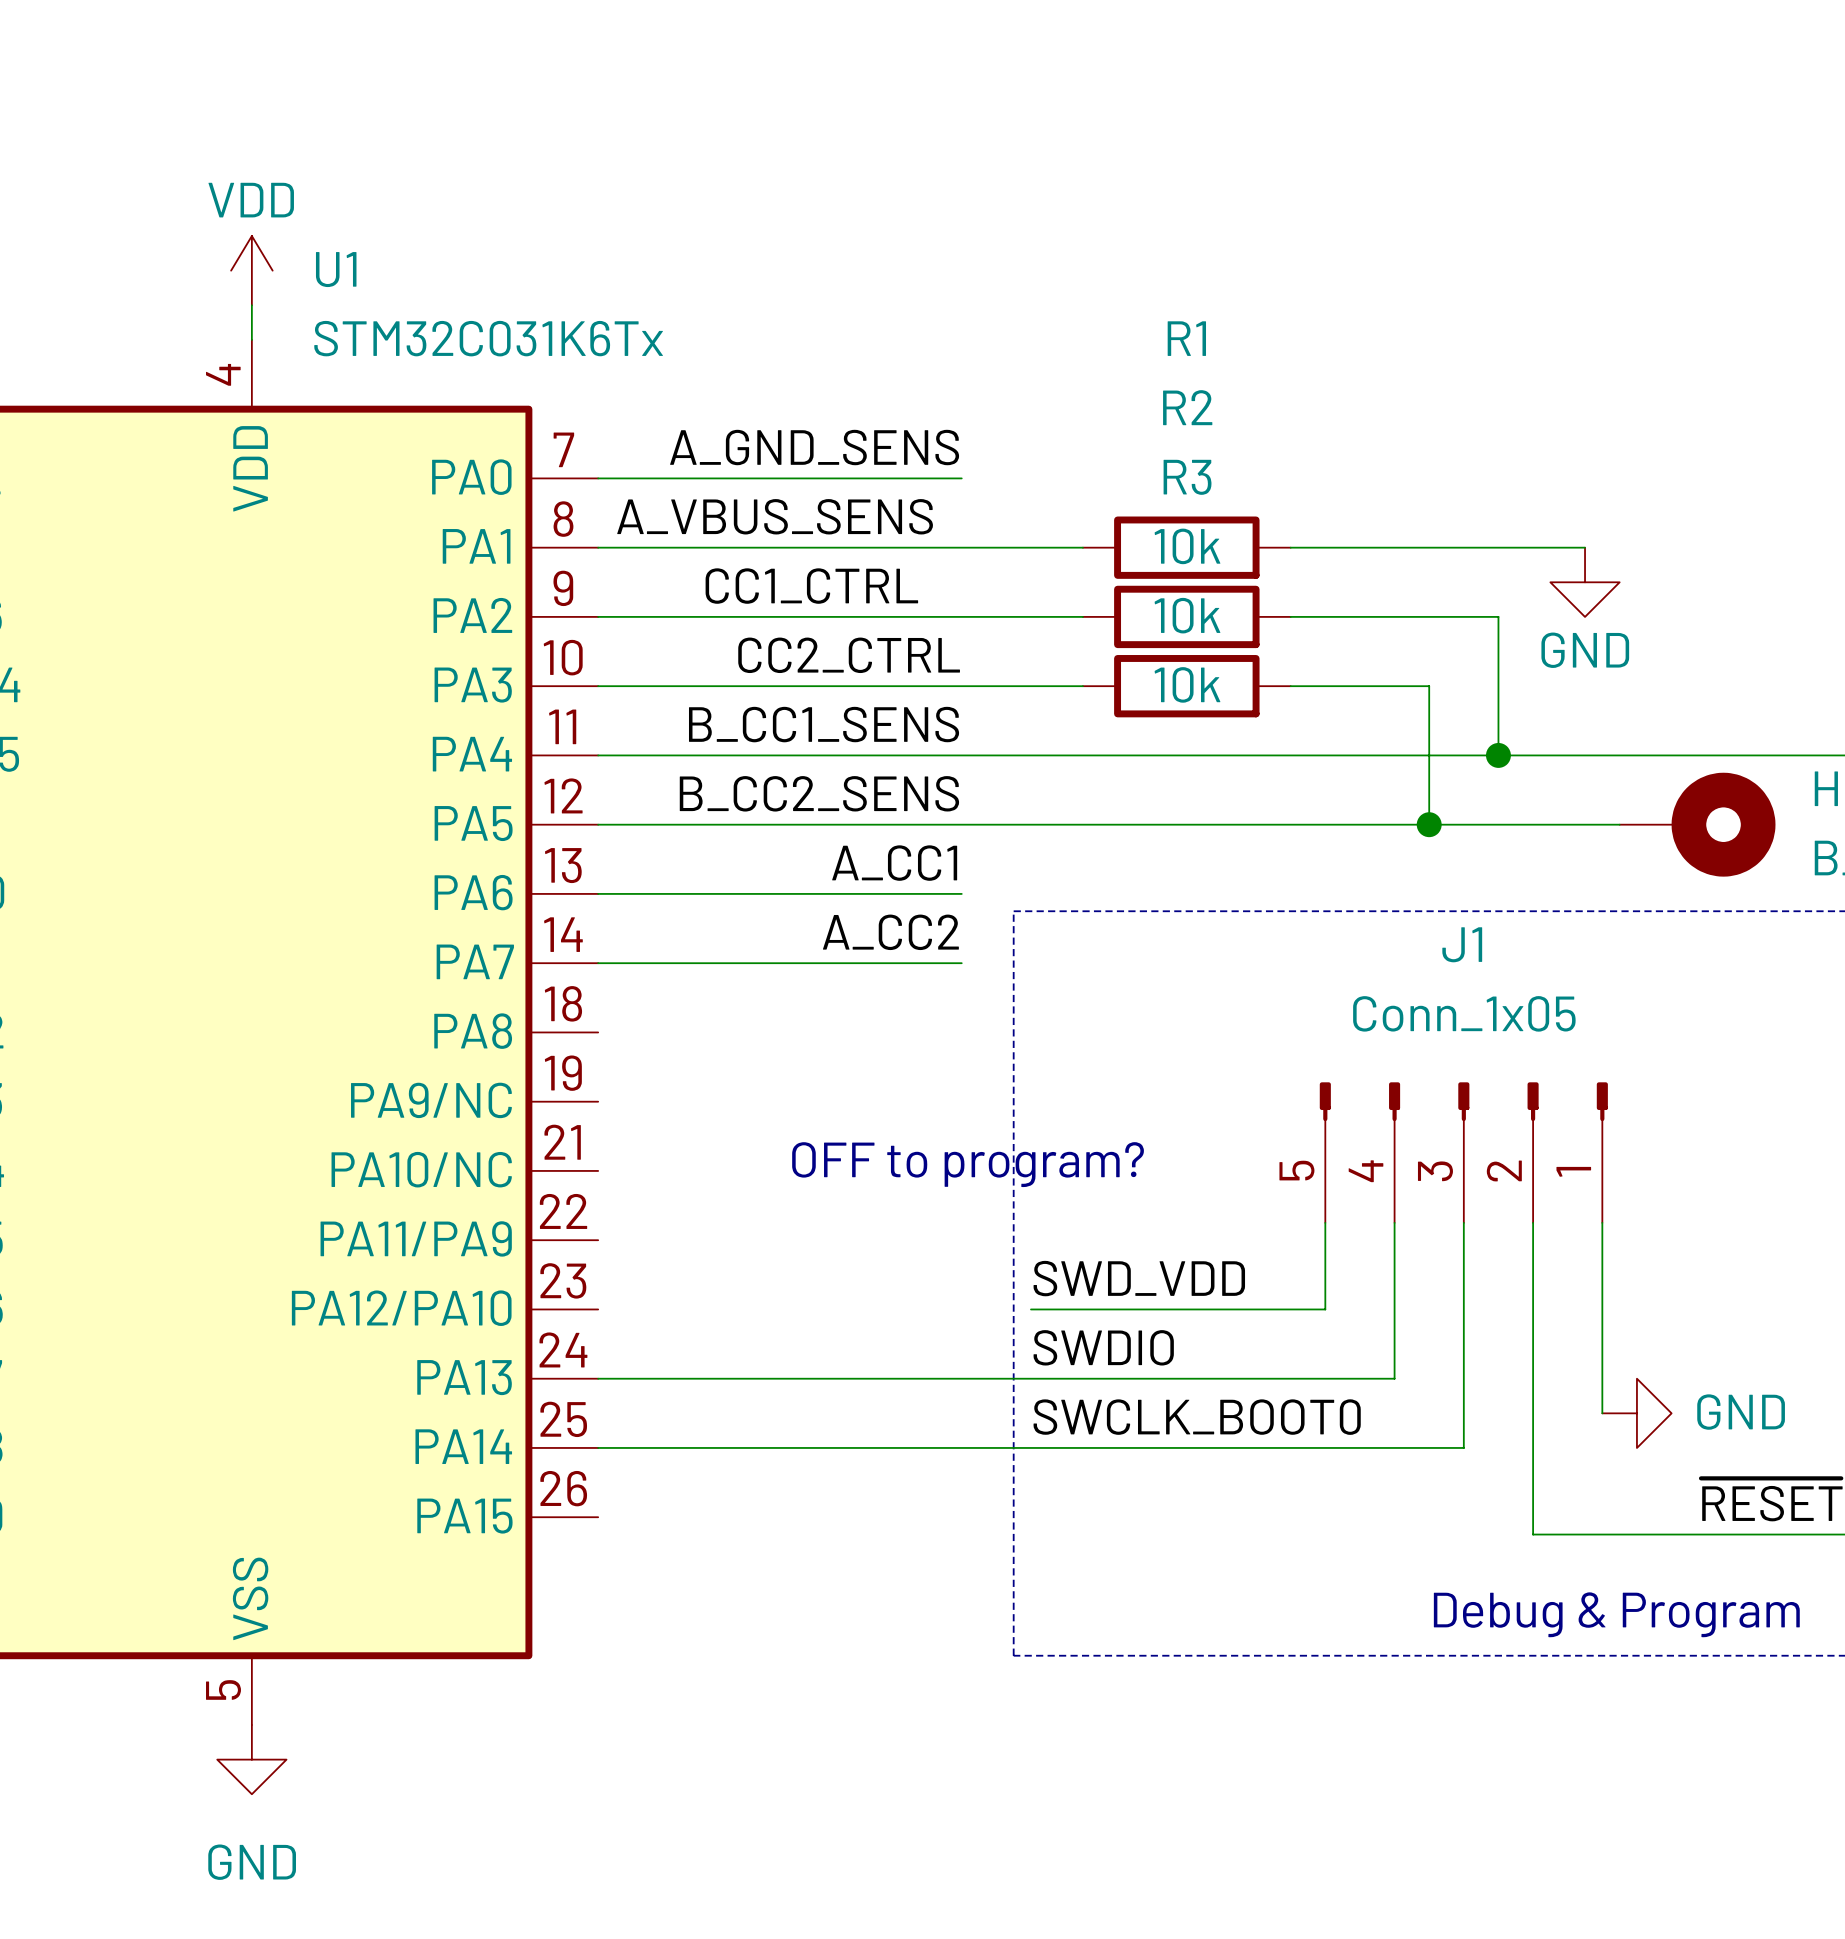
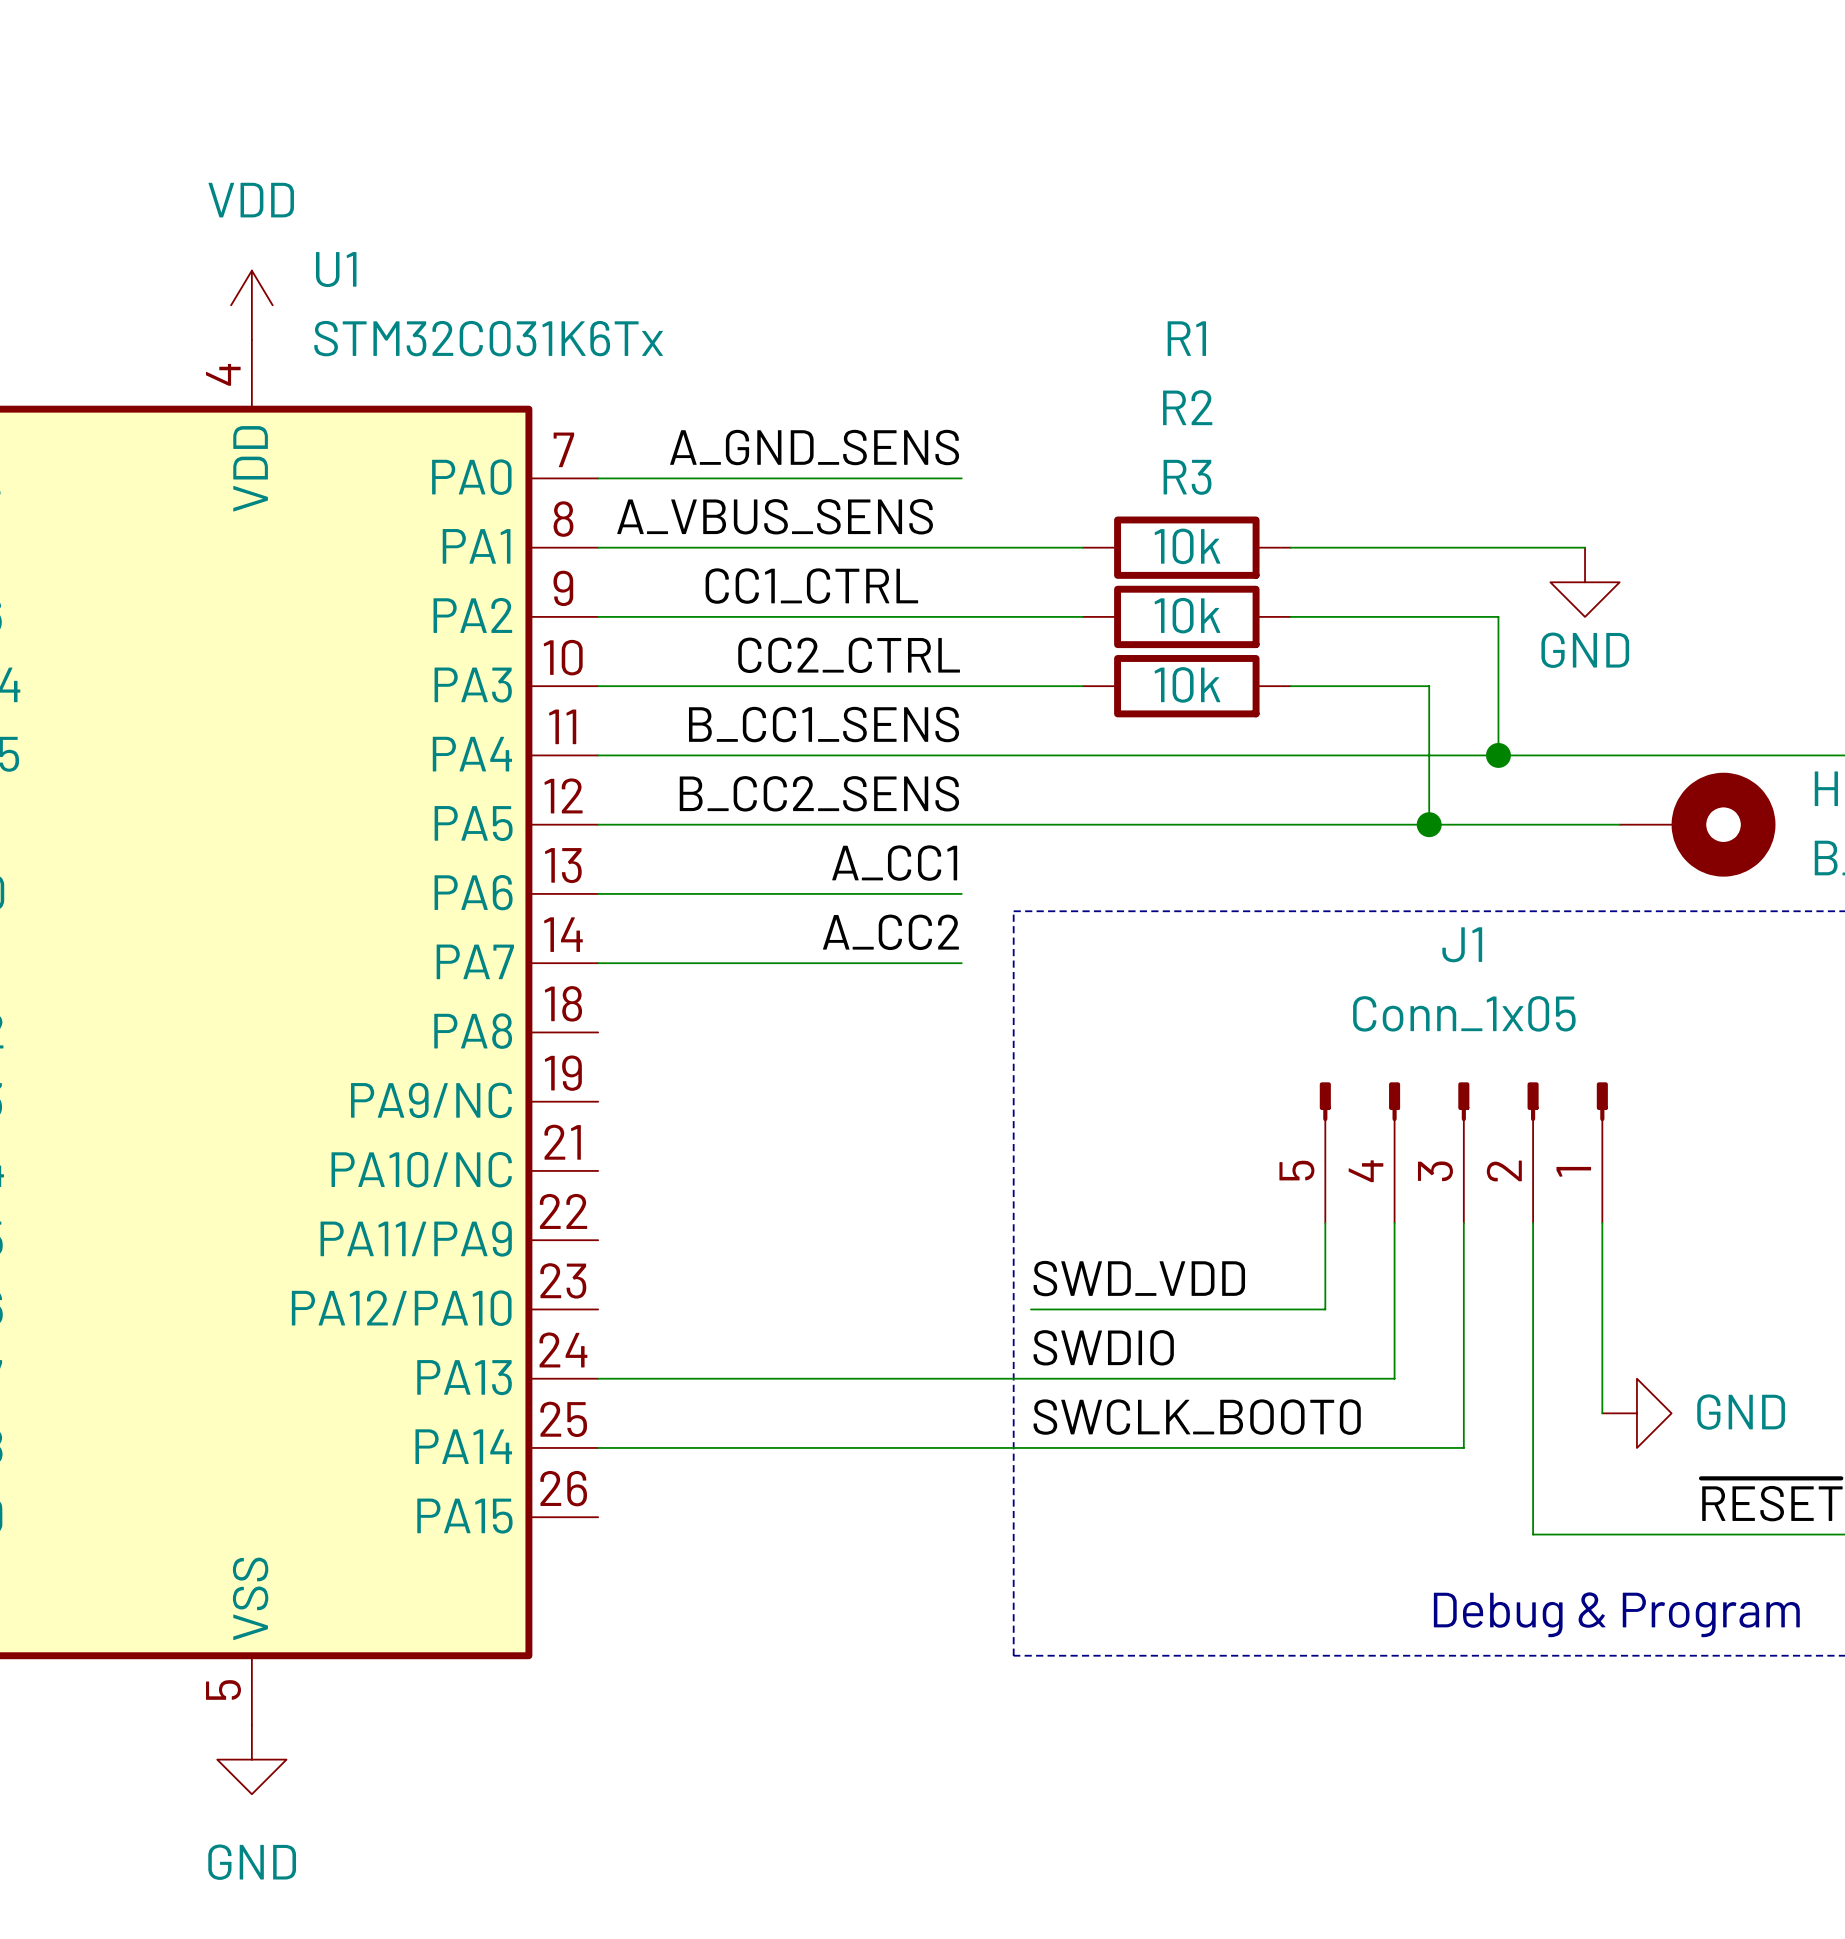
power symbol position: VDD (251, 270) -> VDD (251, 305)
text: OFF to program? (968, 1164) -> none

